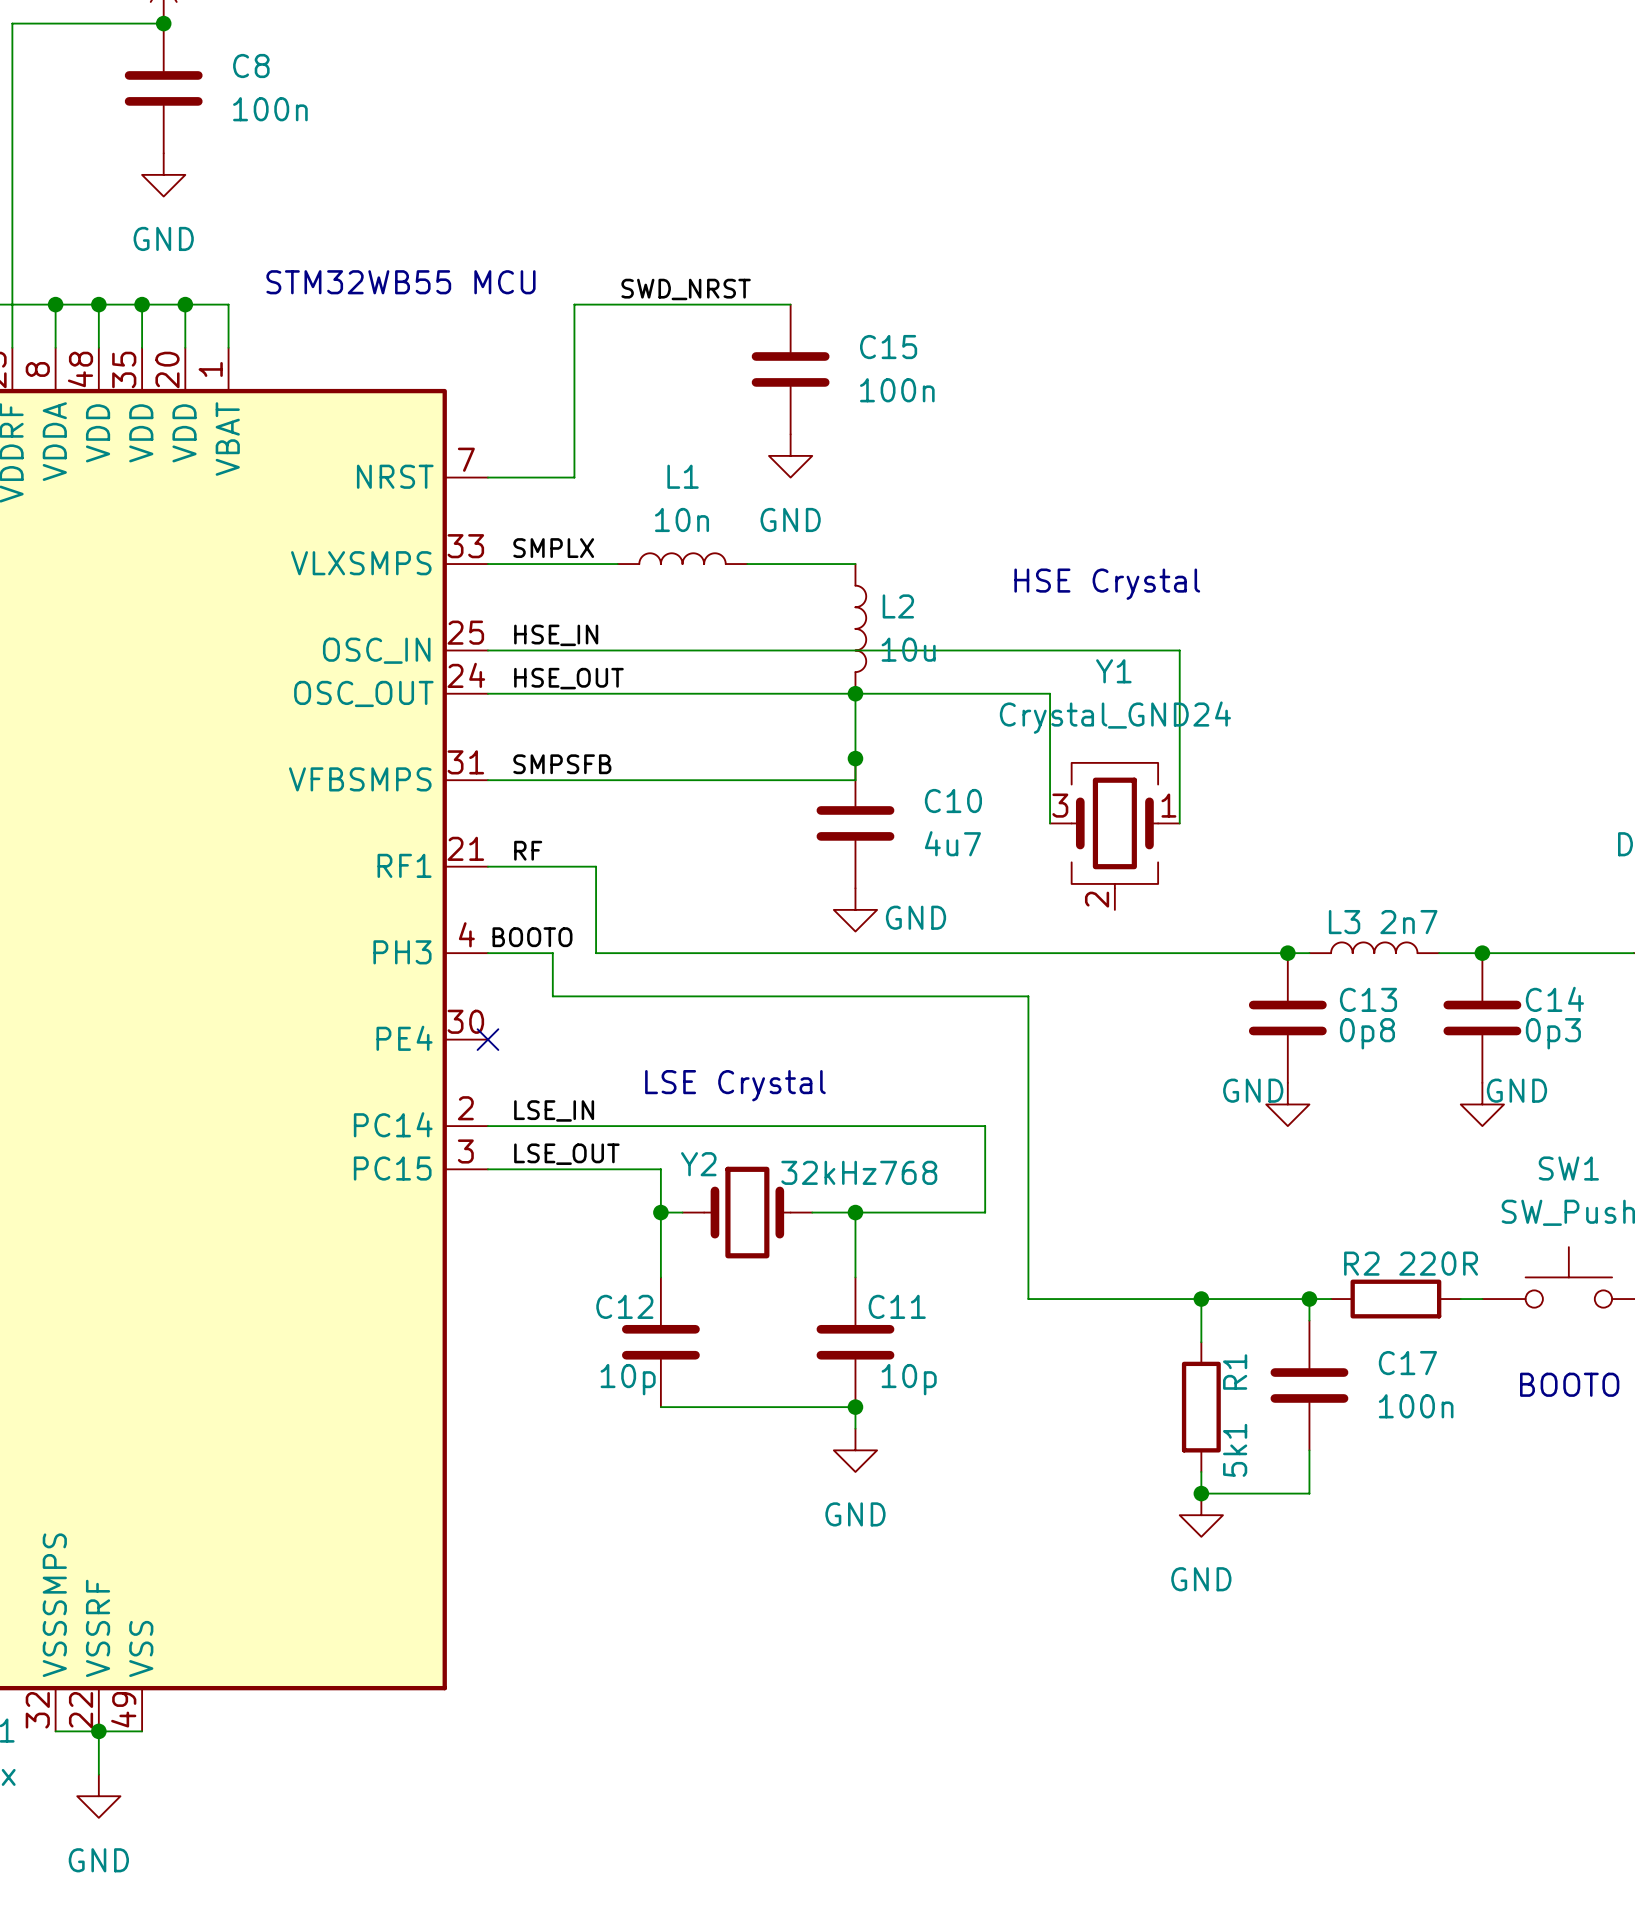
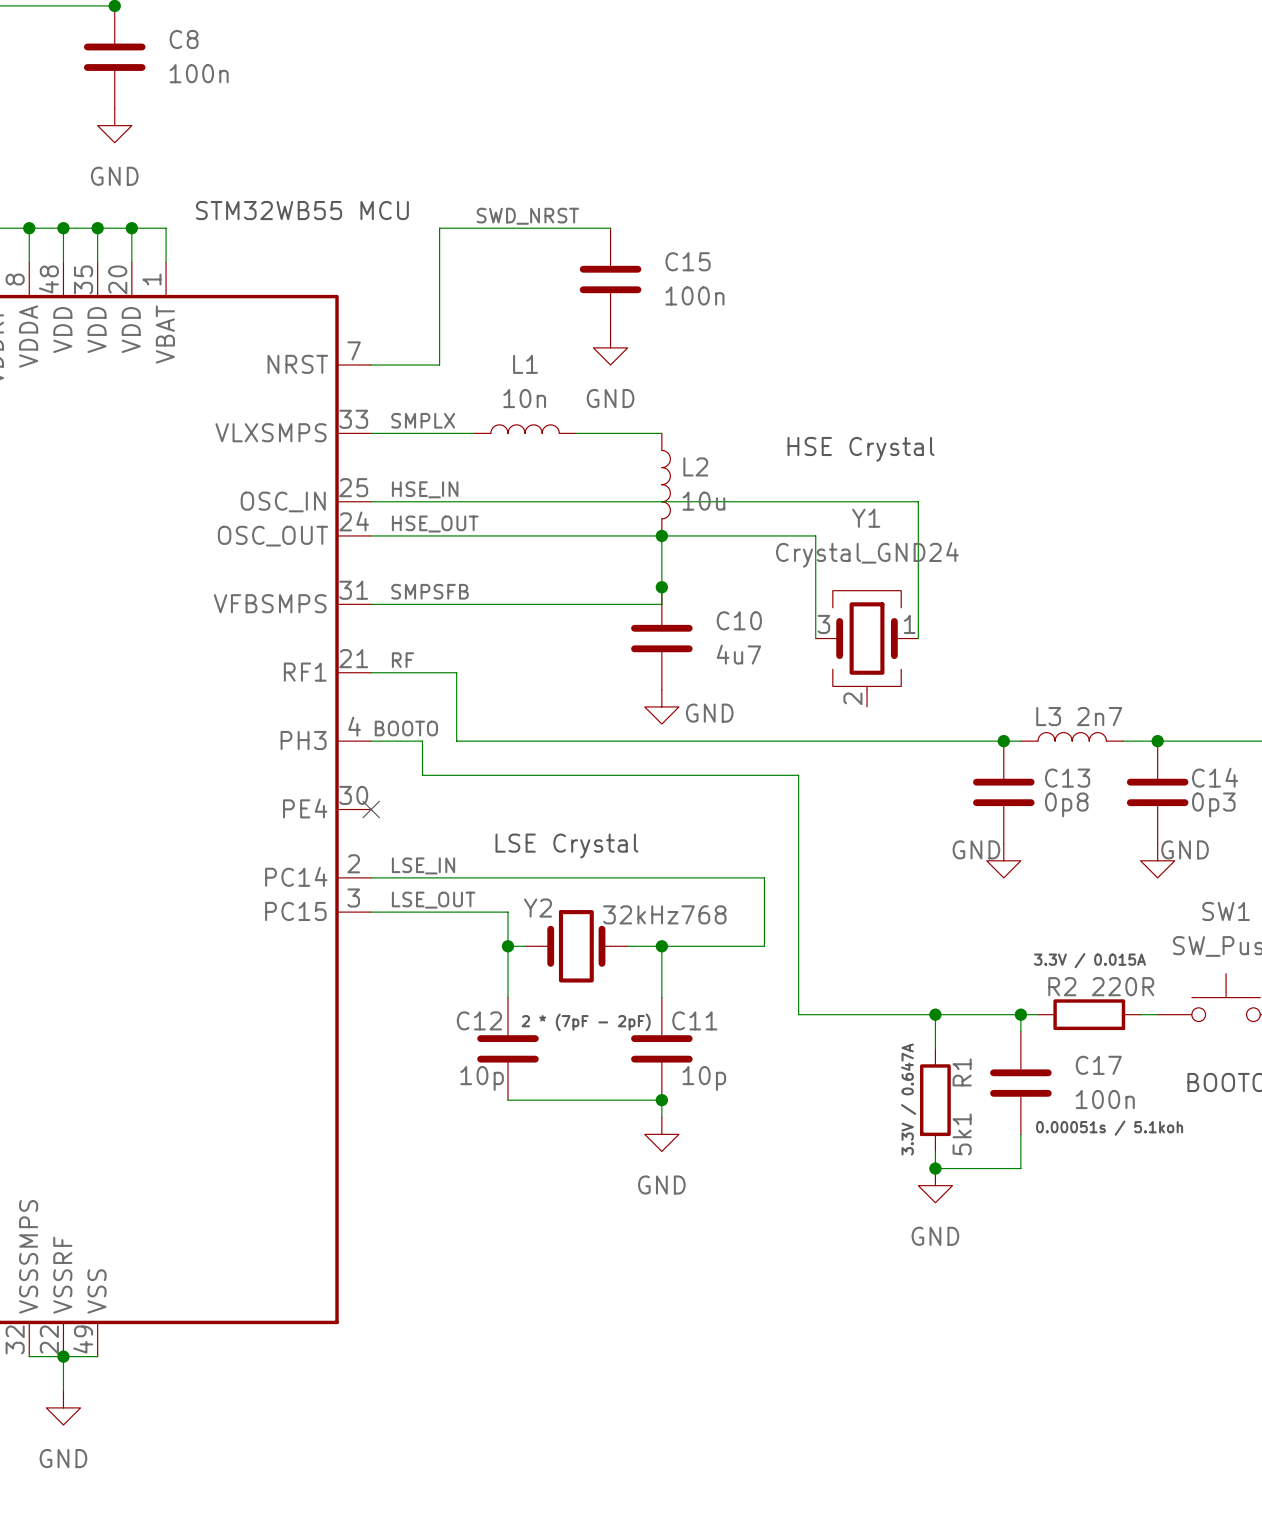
text: none -> 3.3V / 0.015A (1090, 960)
text: none -> 2 * (7pF - 2pF) (586, 1022)
text: none -> 3.3V / 0.647A (908, 1099)
text: none -> 0.00051s / 5.1koh (1109, 1128)

